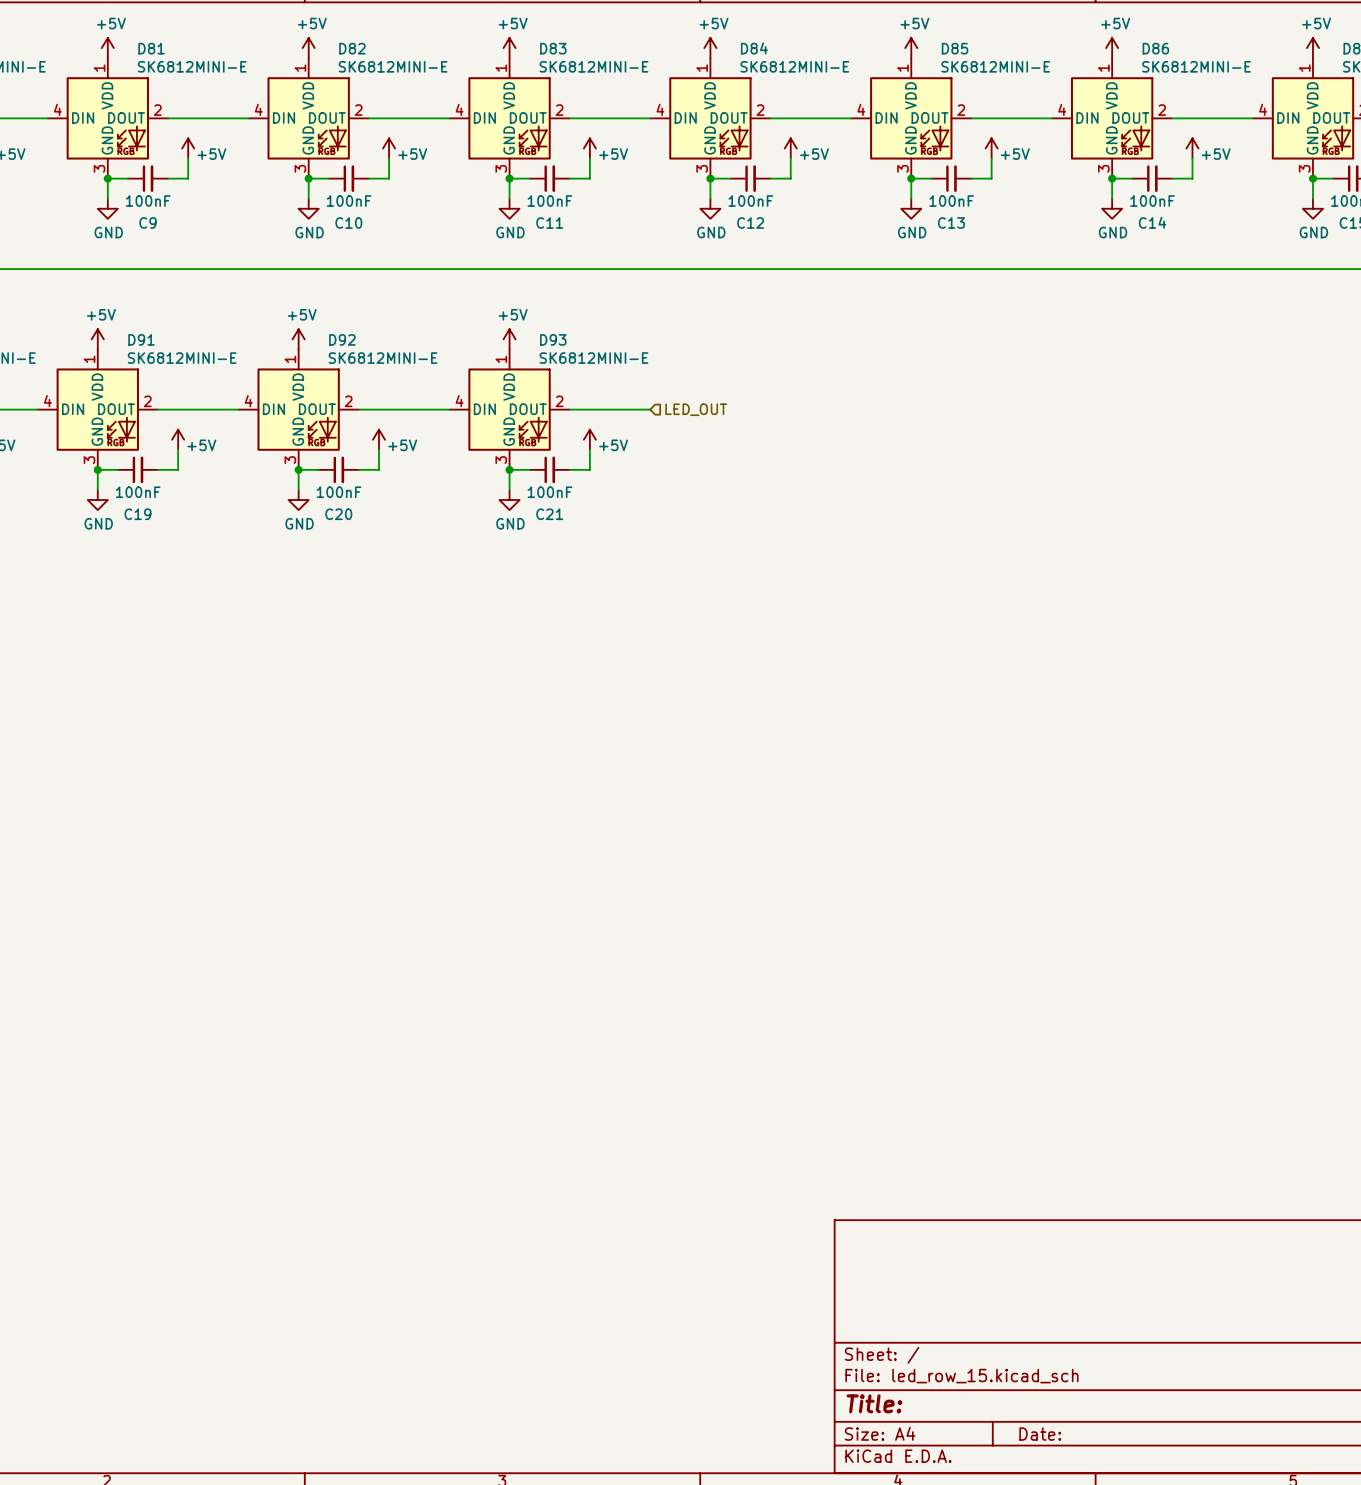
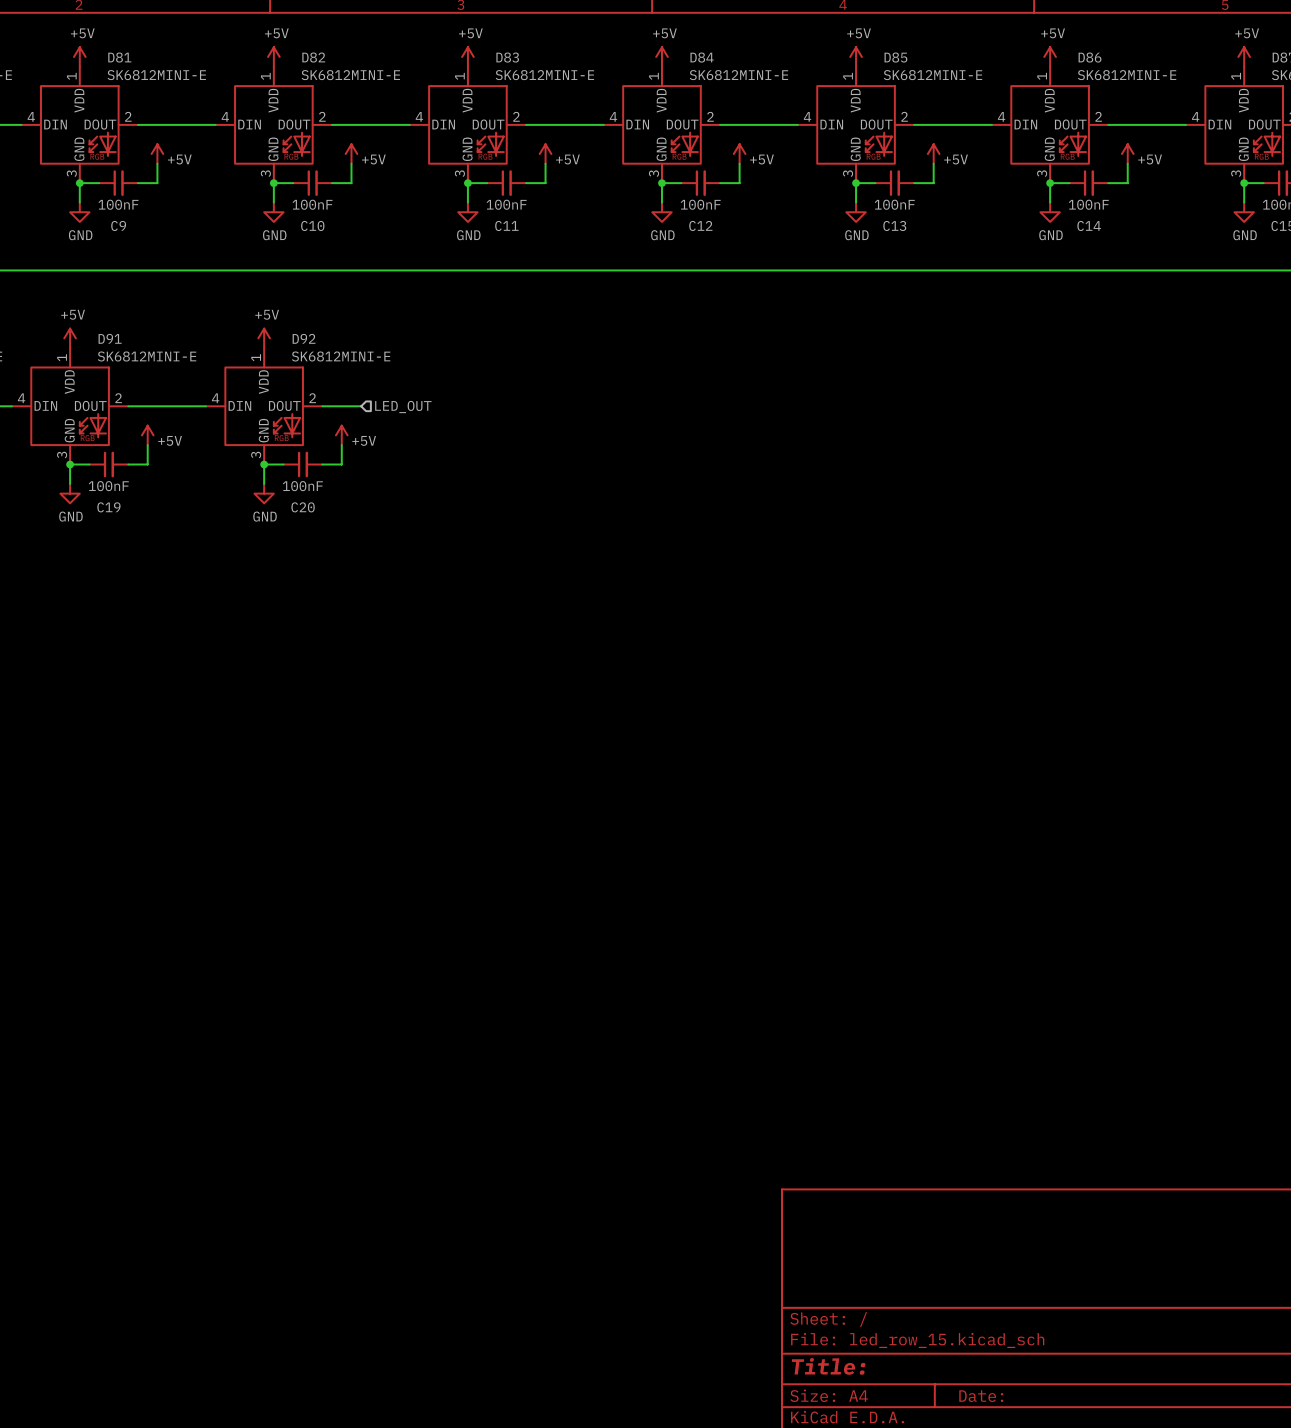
power symbol: +5V (509, 339) -> none
wire: (399, 409) (449, 409) -> none
hierarchical label: none -> LED_OUT (403, 407)
D93: SK6812MINI-E (509, 409) -> none
wire: (569, 409) (650, 409) -> none
hierarchical label: LED_OUT (696, 409) -> none
power symbol: +5V (589, 439) -> none
wire: (589, 449) (589, 469) (569, 469) -> none
junction: (509, 469) -> none
wire: (529, 469) (509, 469) (509, 489) -> none
C21: 100nF (549, 469) -> none
power symbol: GND (509, 500) -> none

